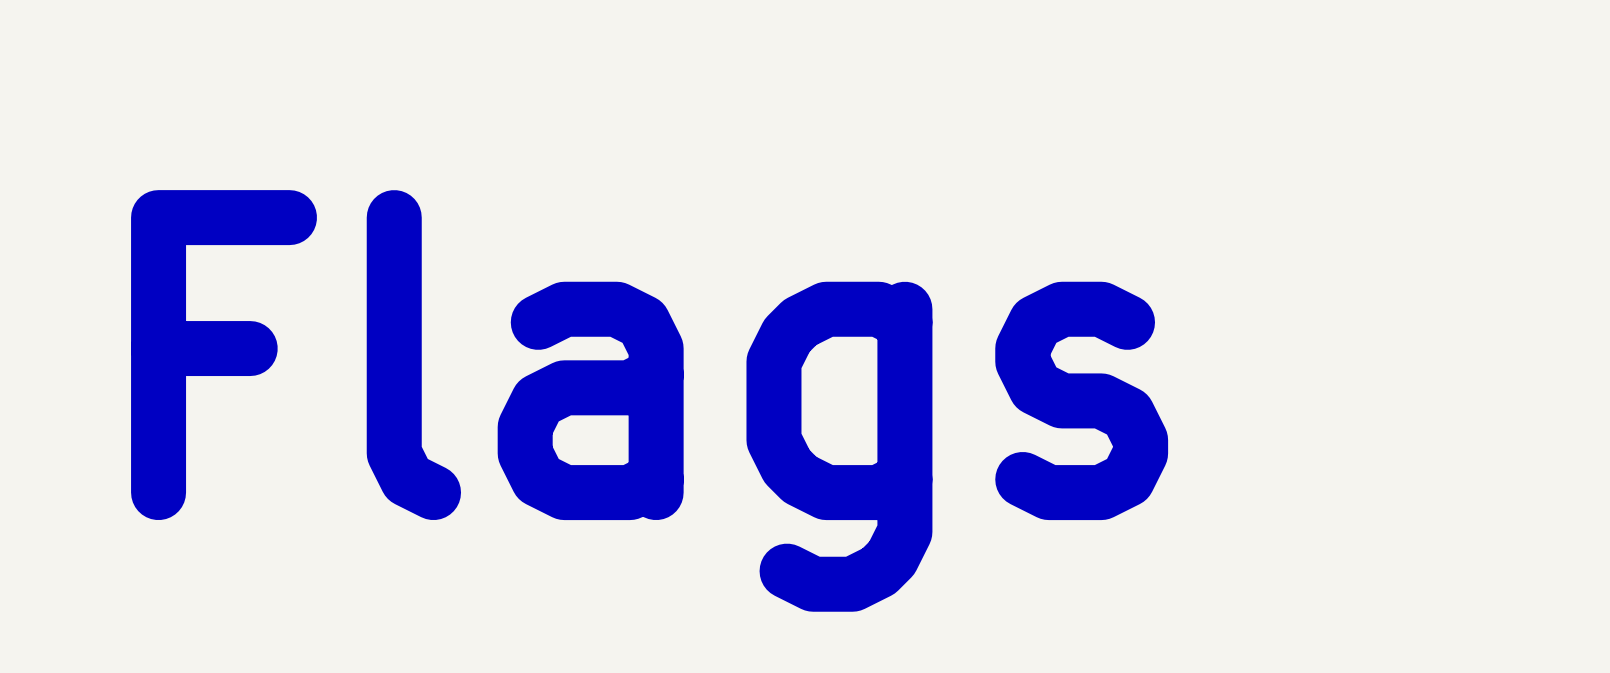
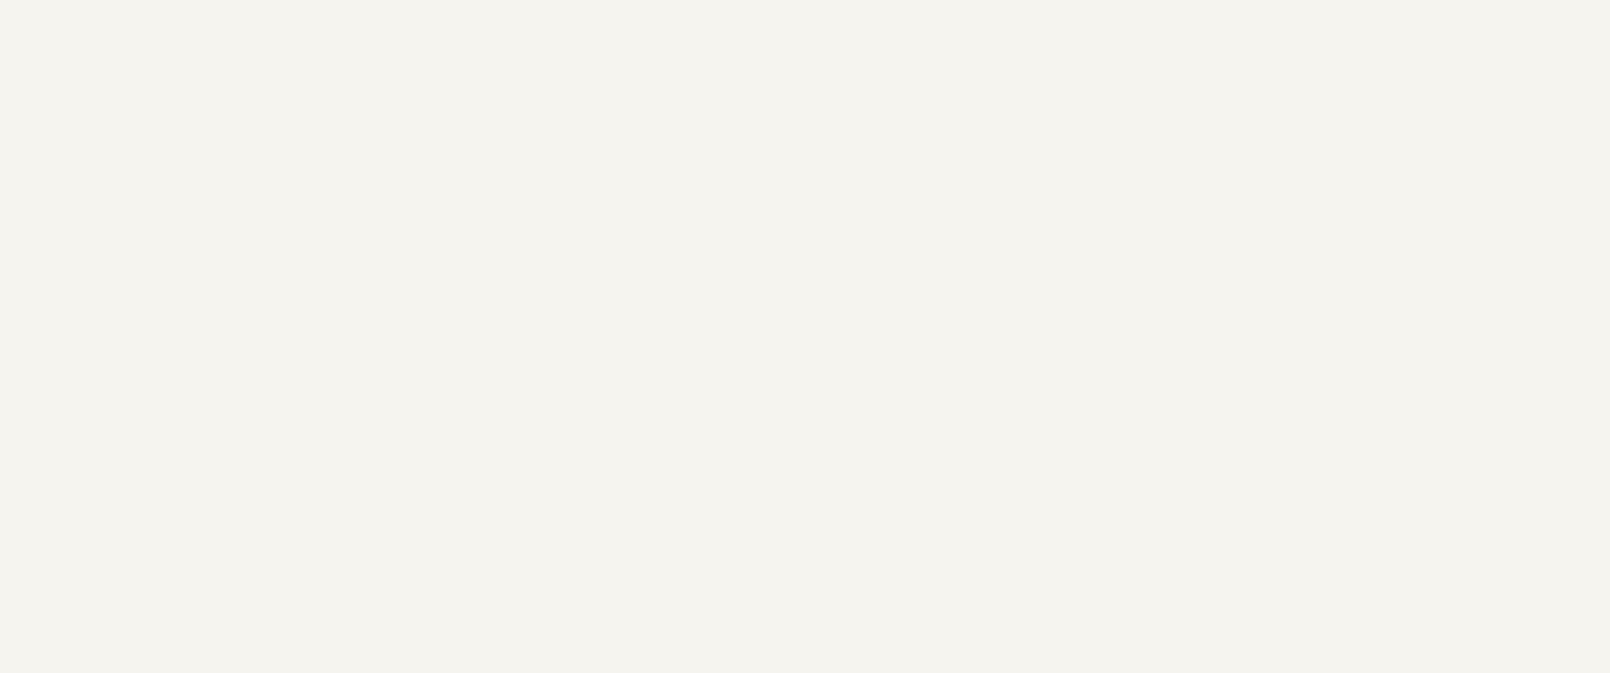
text: Flags (649, 400) -> none

